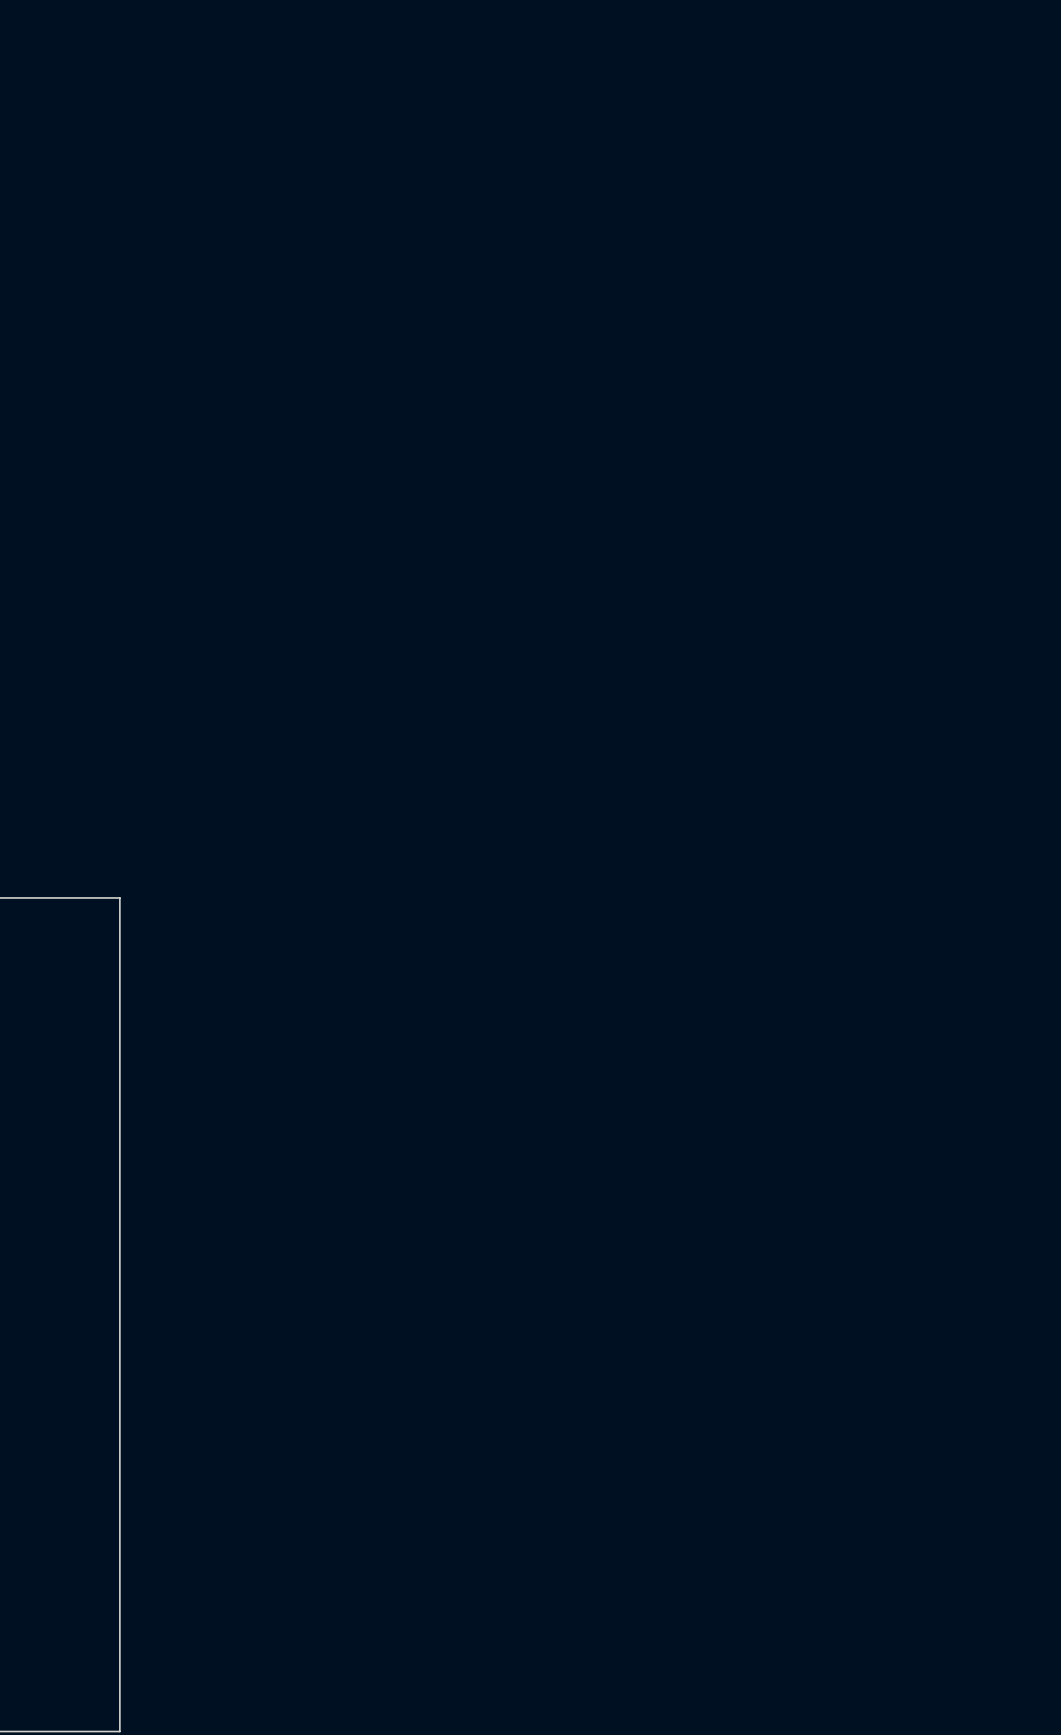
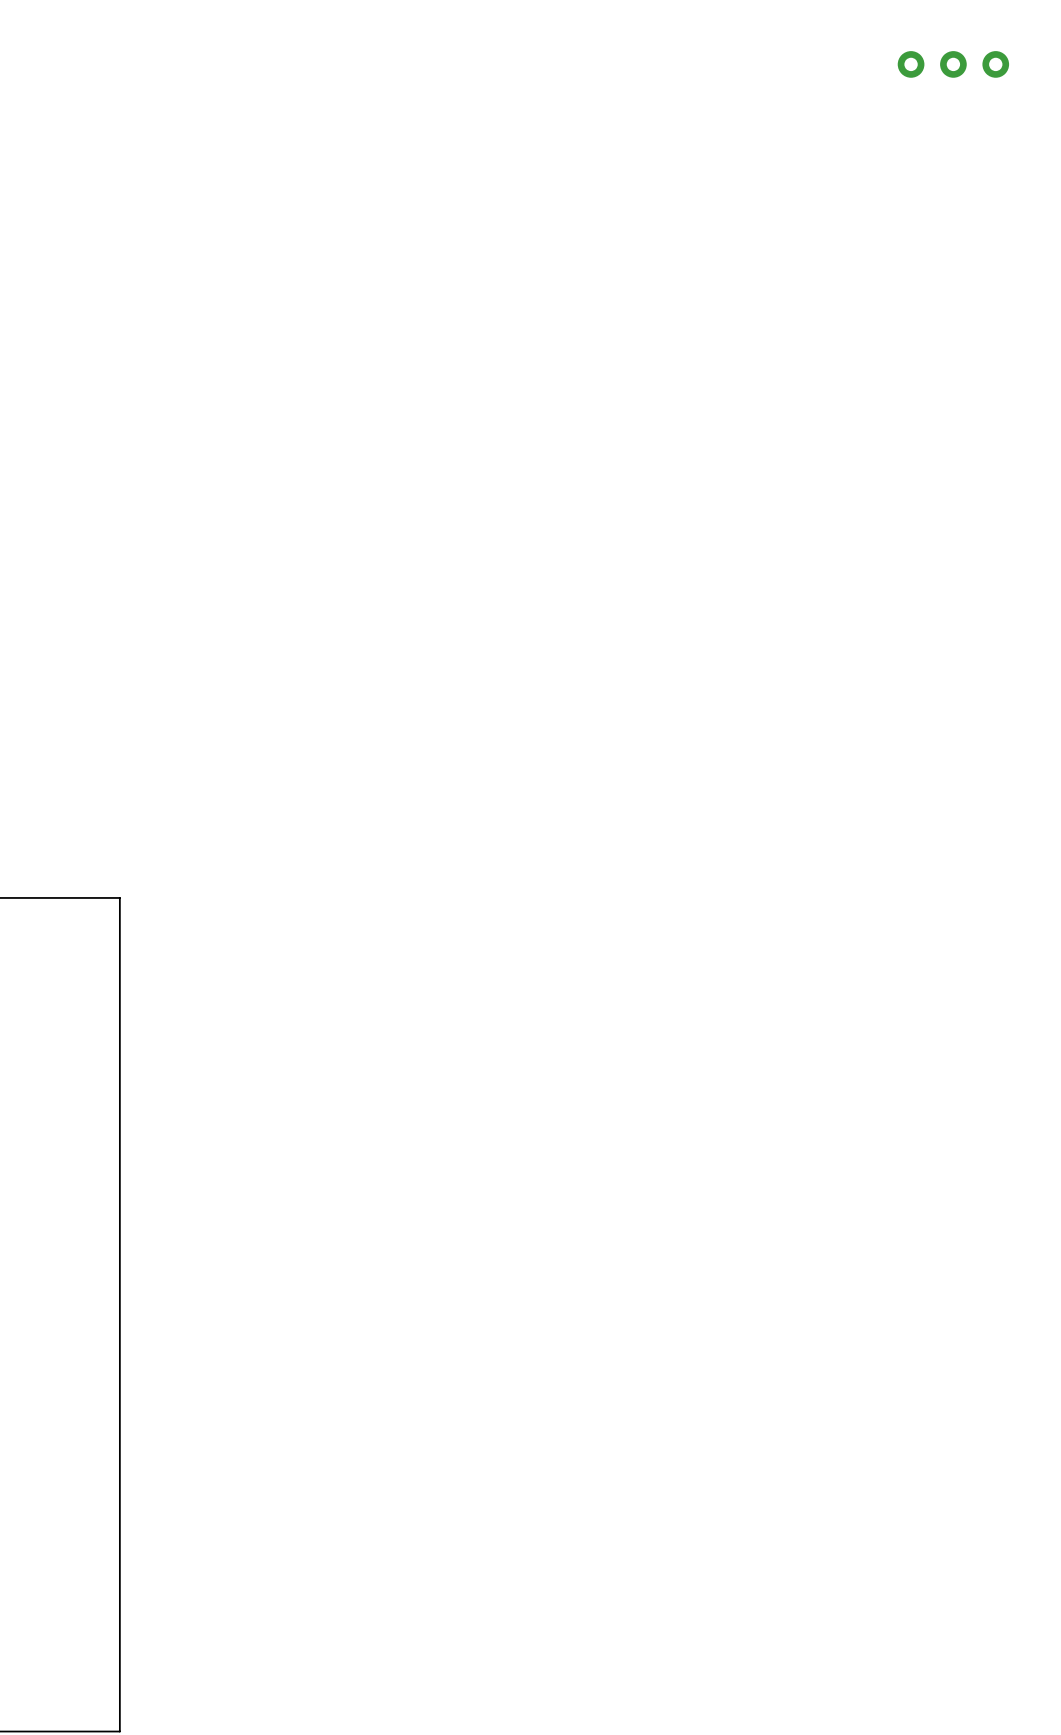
part: none -> (953, 64)

